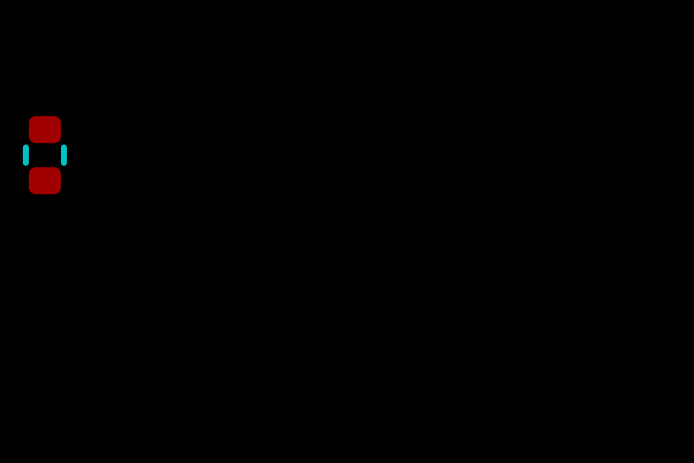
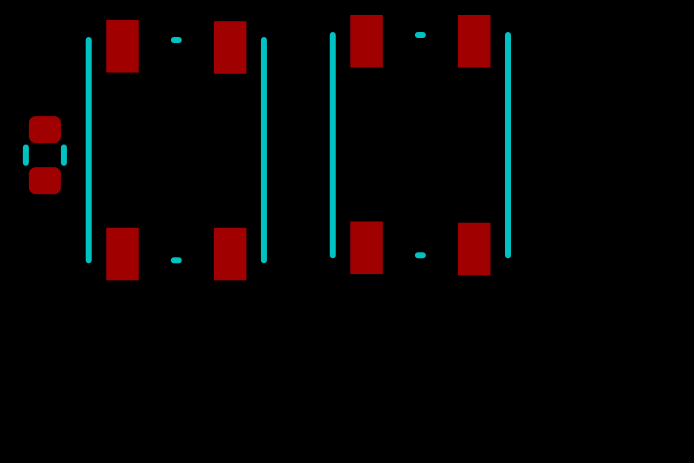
part: none -> (420, 145)
part: none -> (176, 150)

